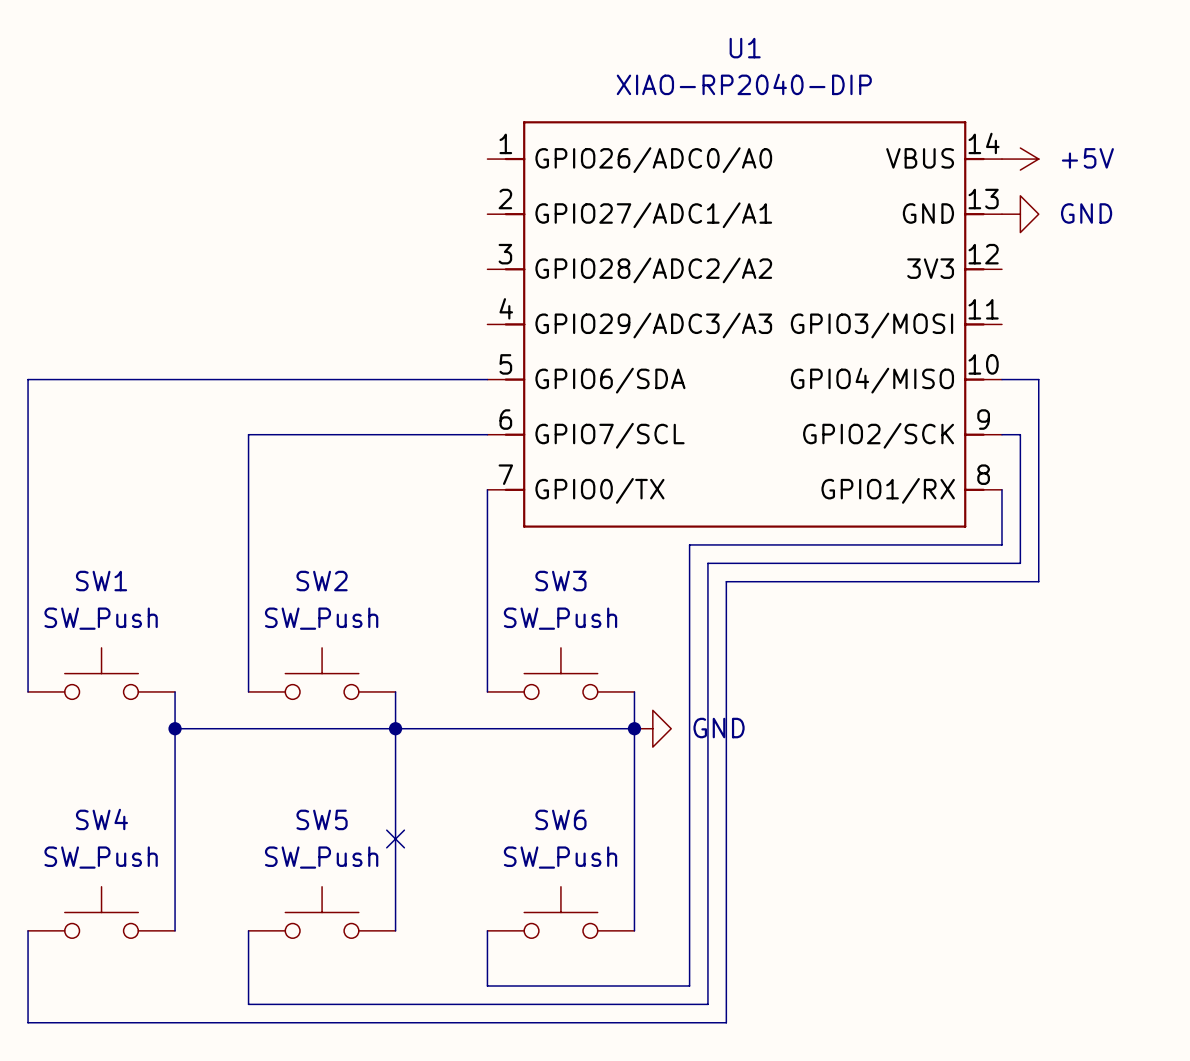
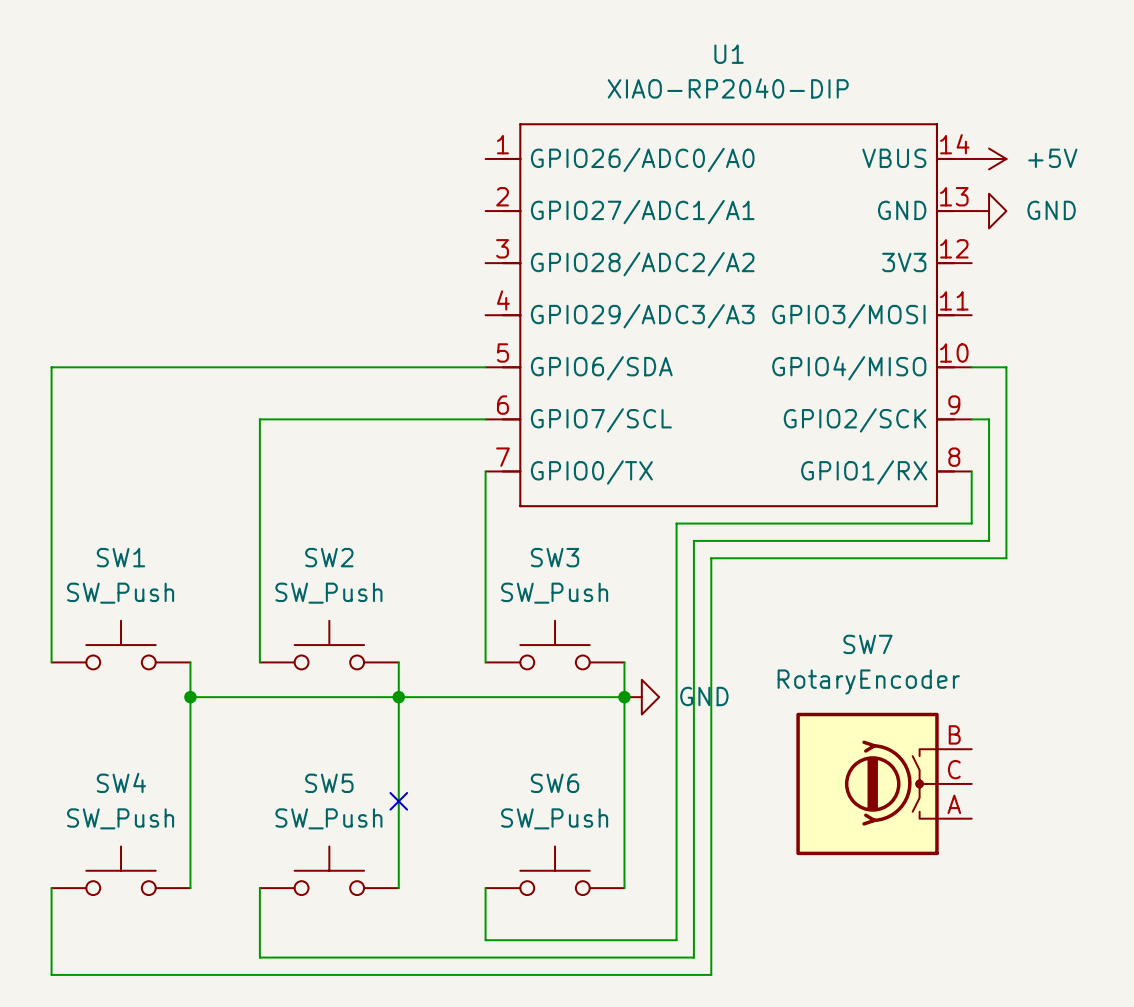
SW7: none -> RotaryEncoder (884, 783)

